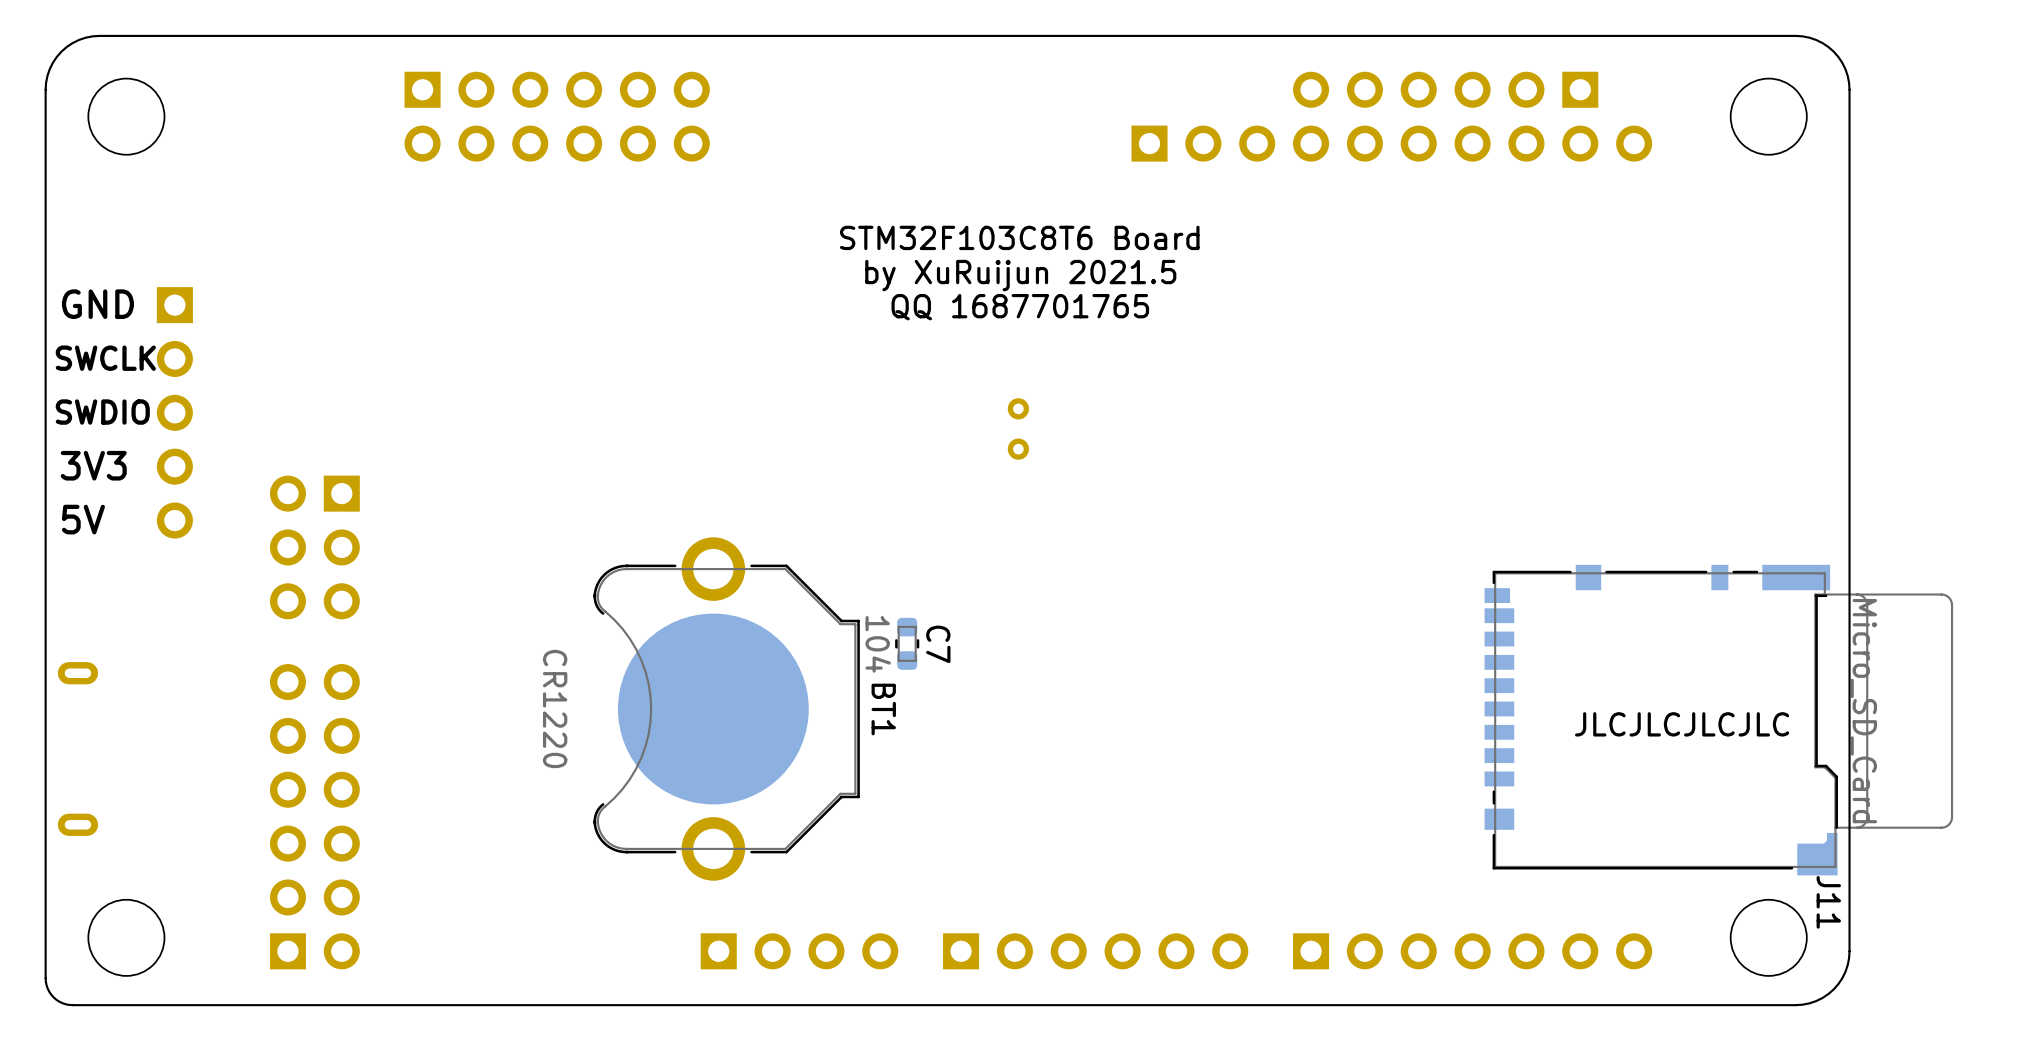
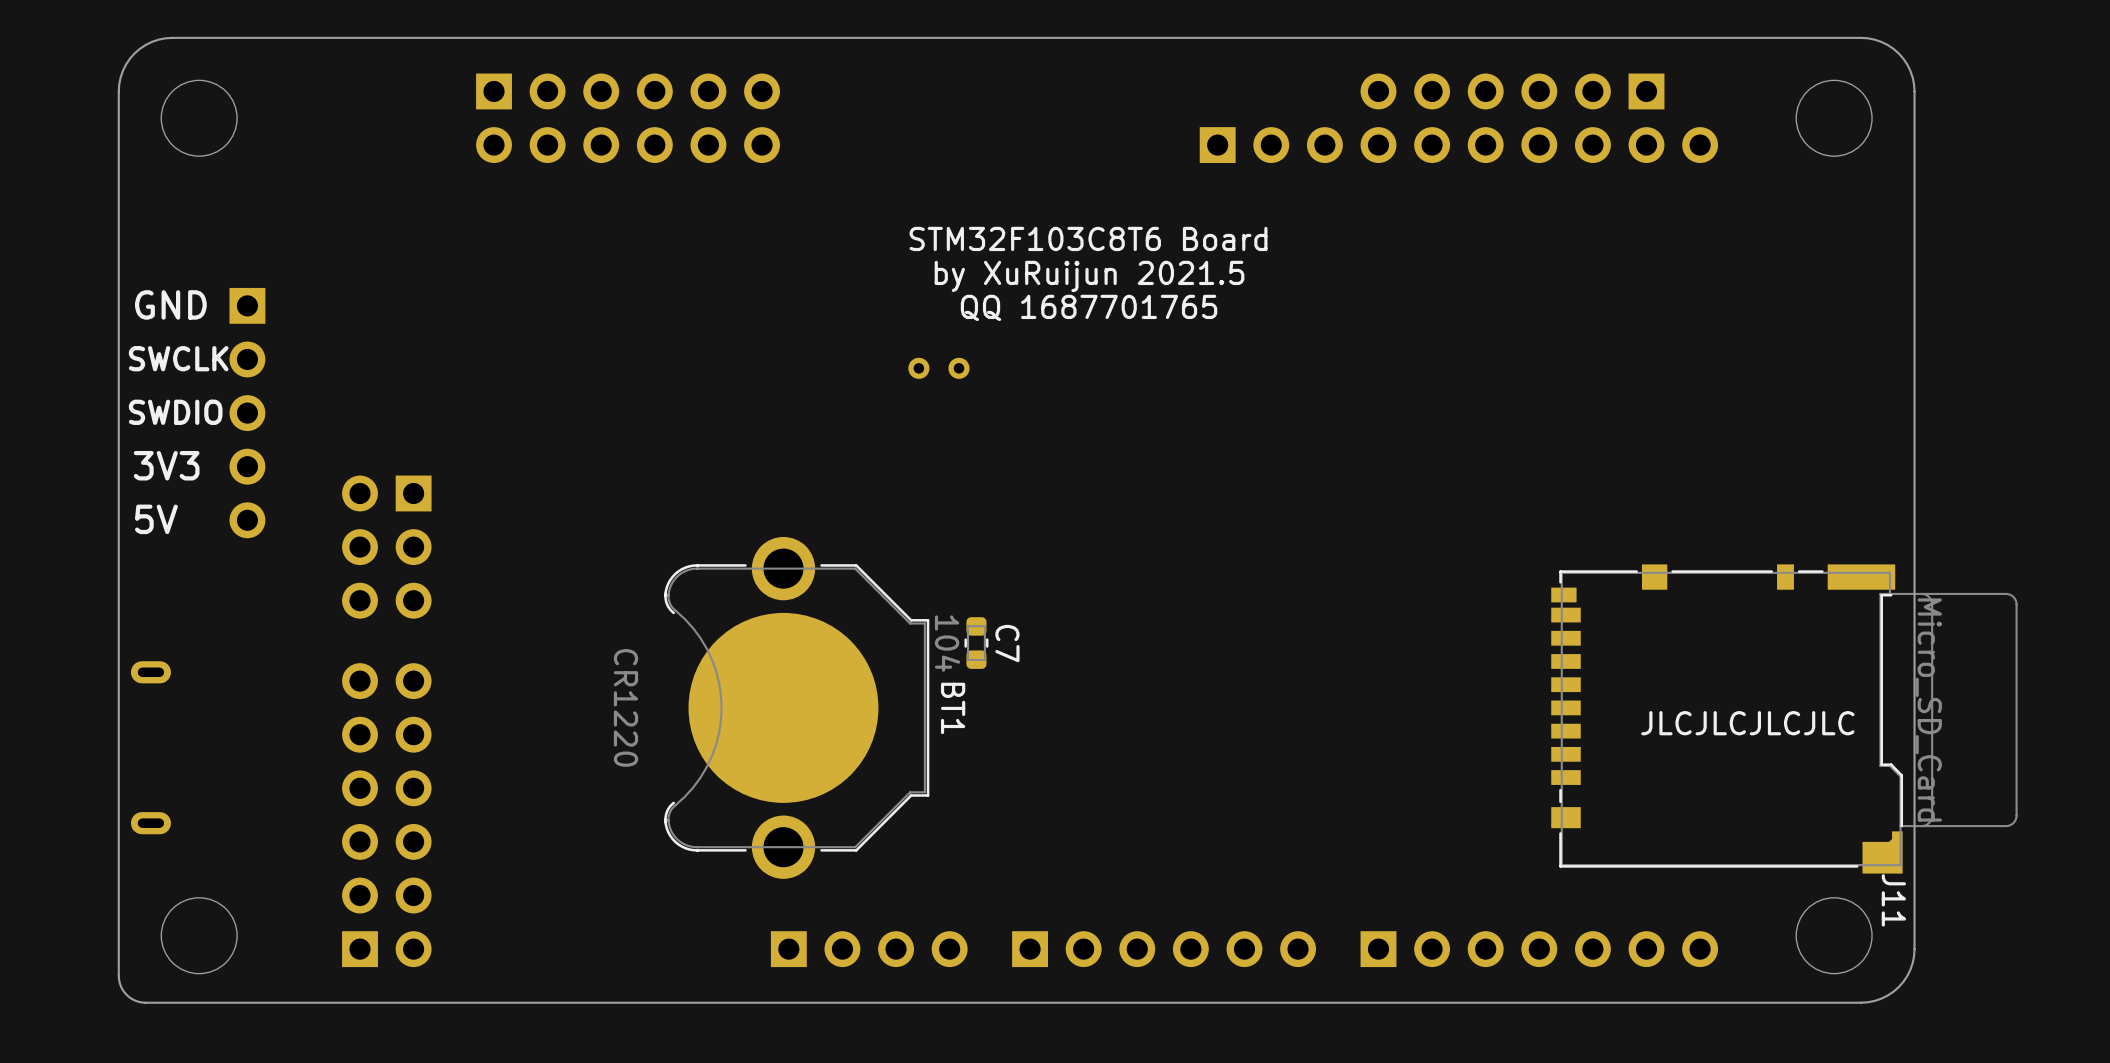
part rotation: 0° (1018, 428) -> 90° clockwise (938, 368)
part position: (1018, 428) -> (938, 368)

